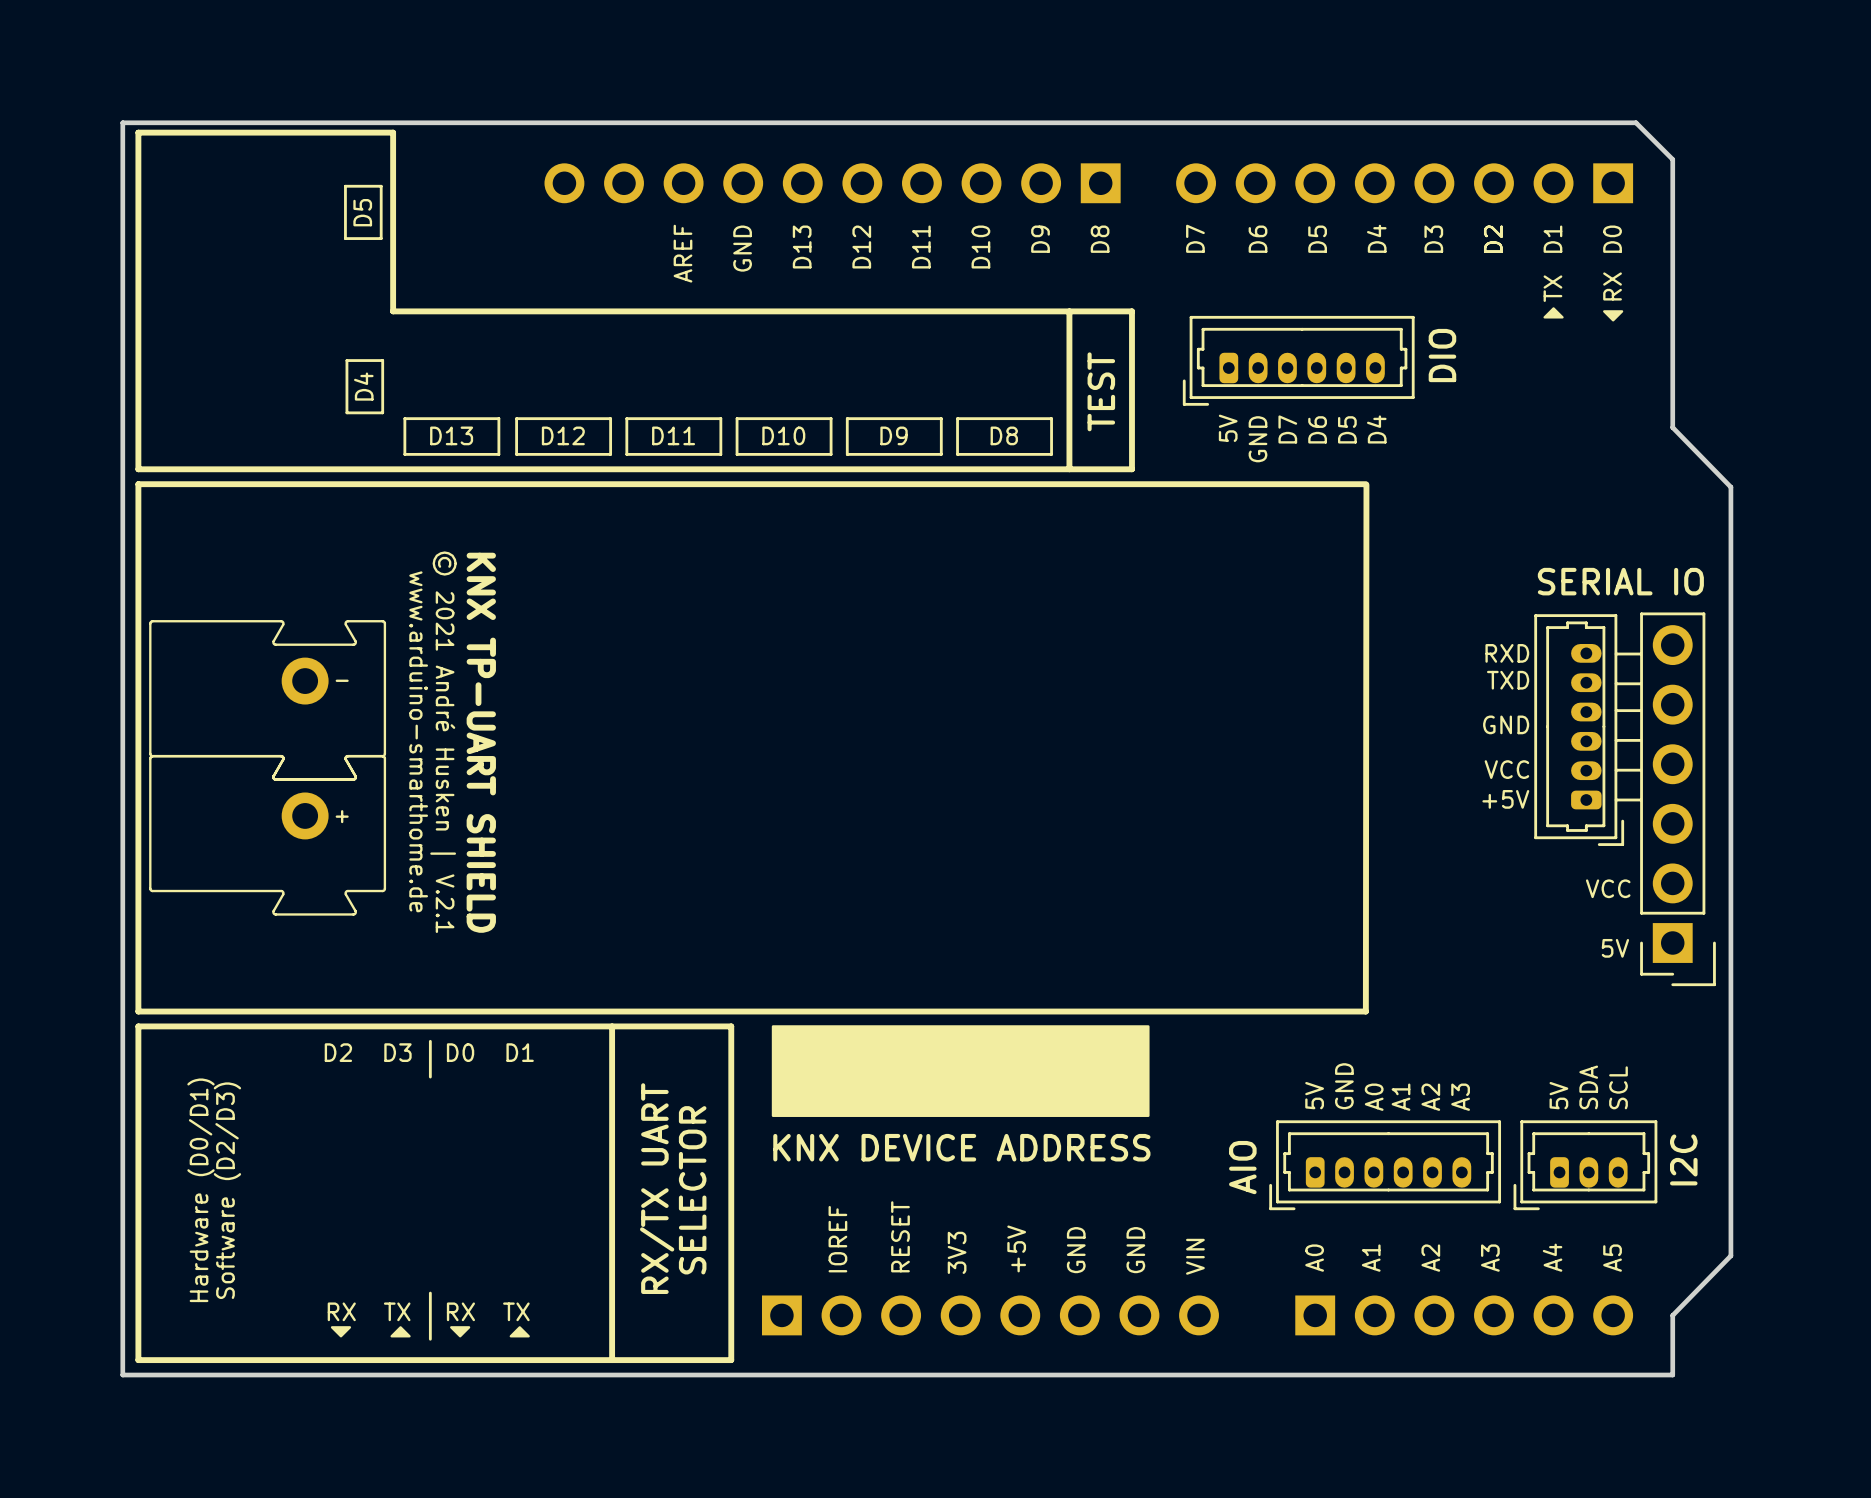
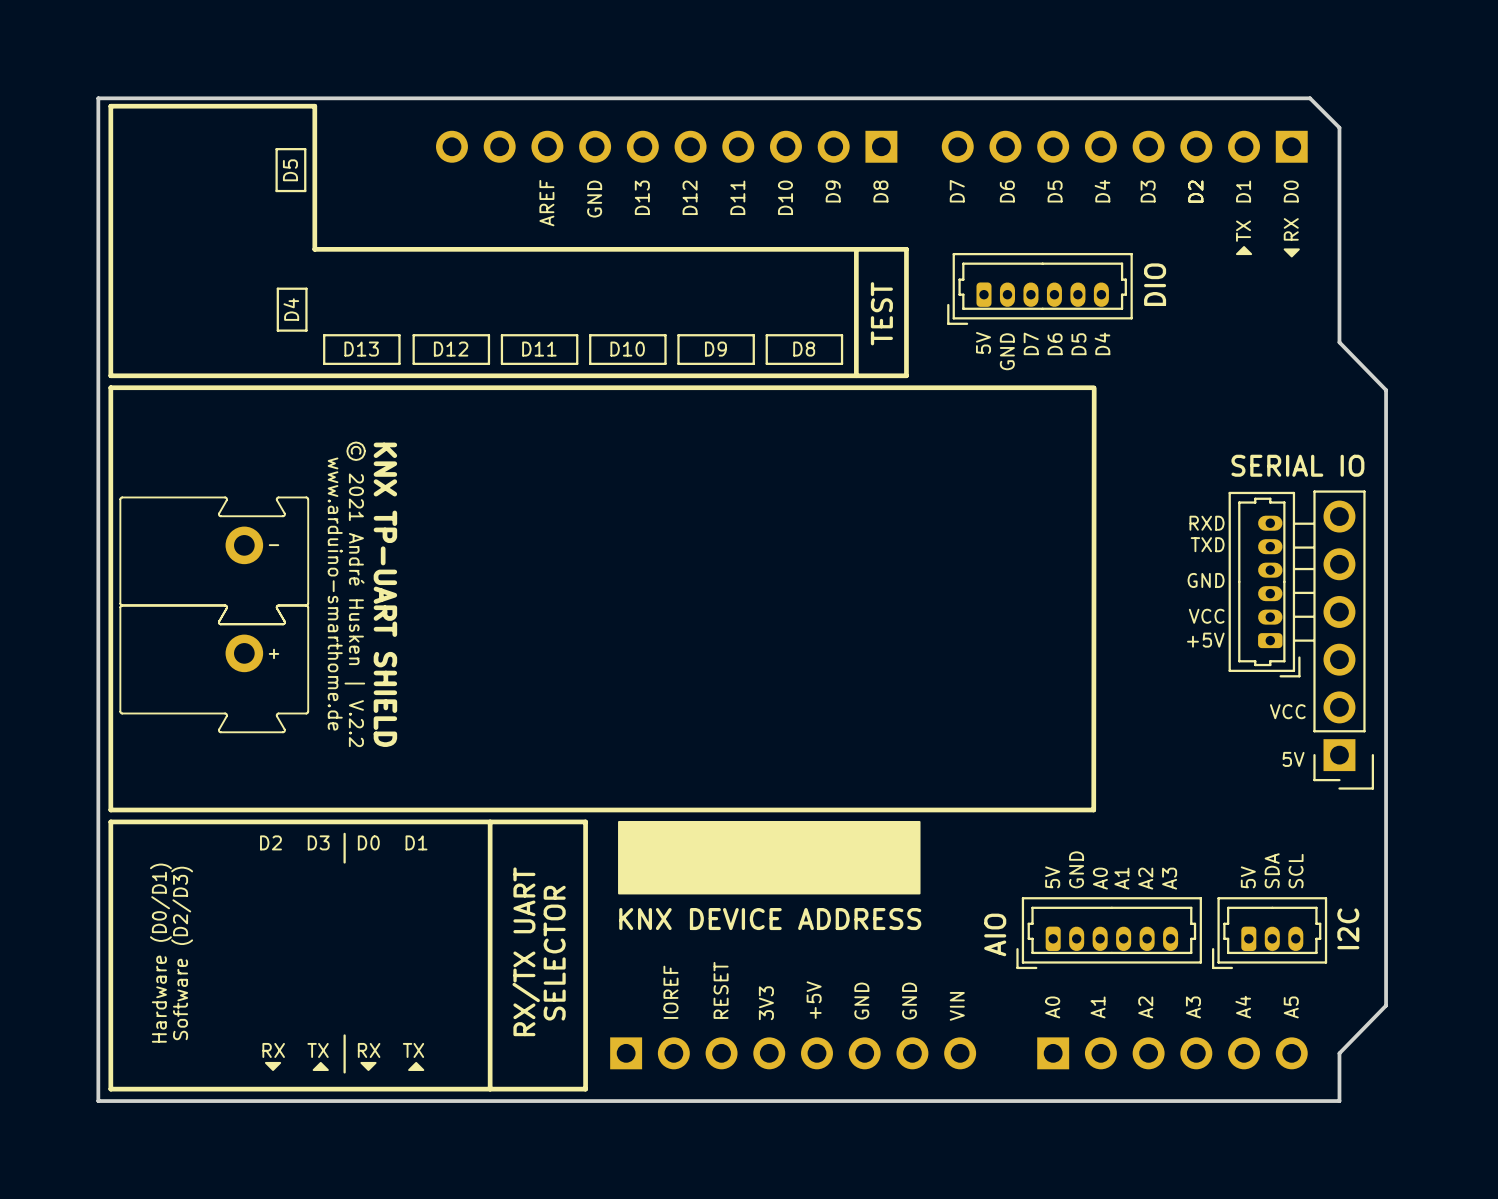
text: © 2021 André Husken | V.2.1 (443, 742) -> © 2021 André Husken | V.2.2 (355, 594)

